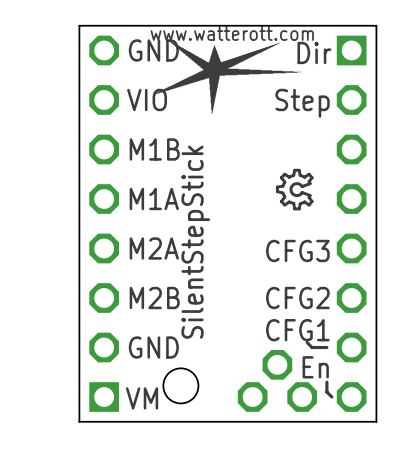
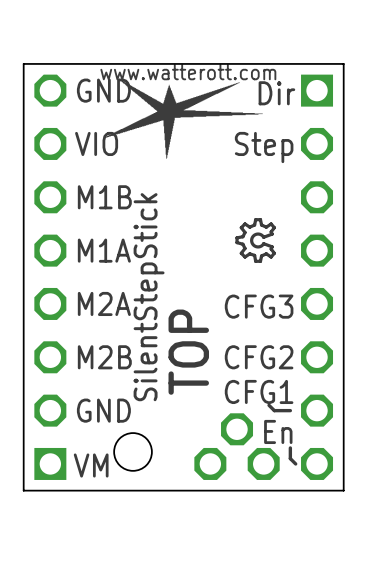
text: none -> TOP (188, 352)

